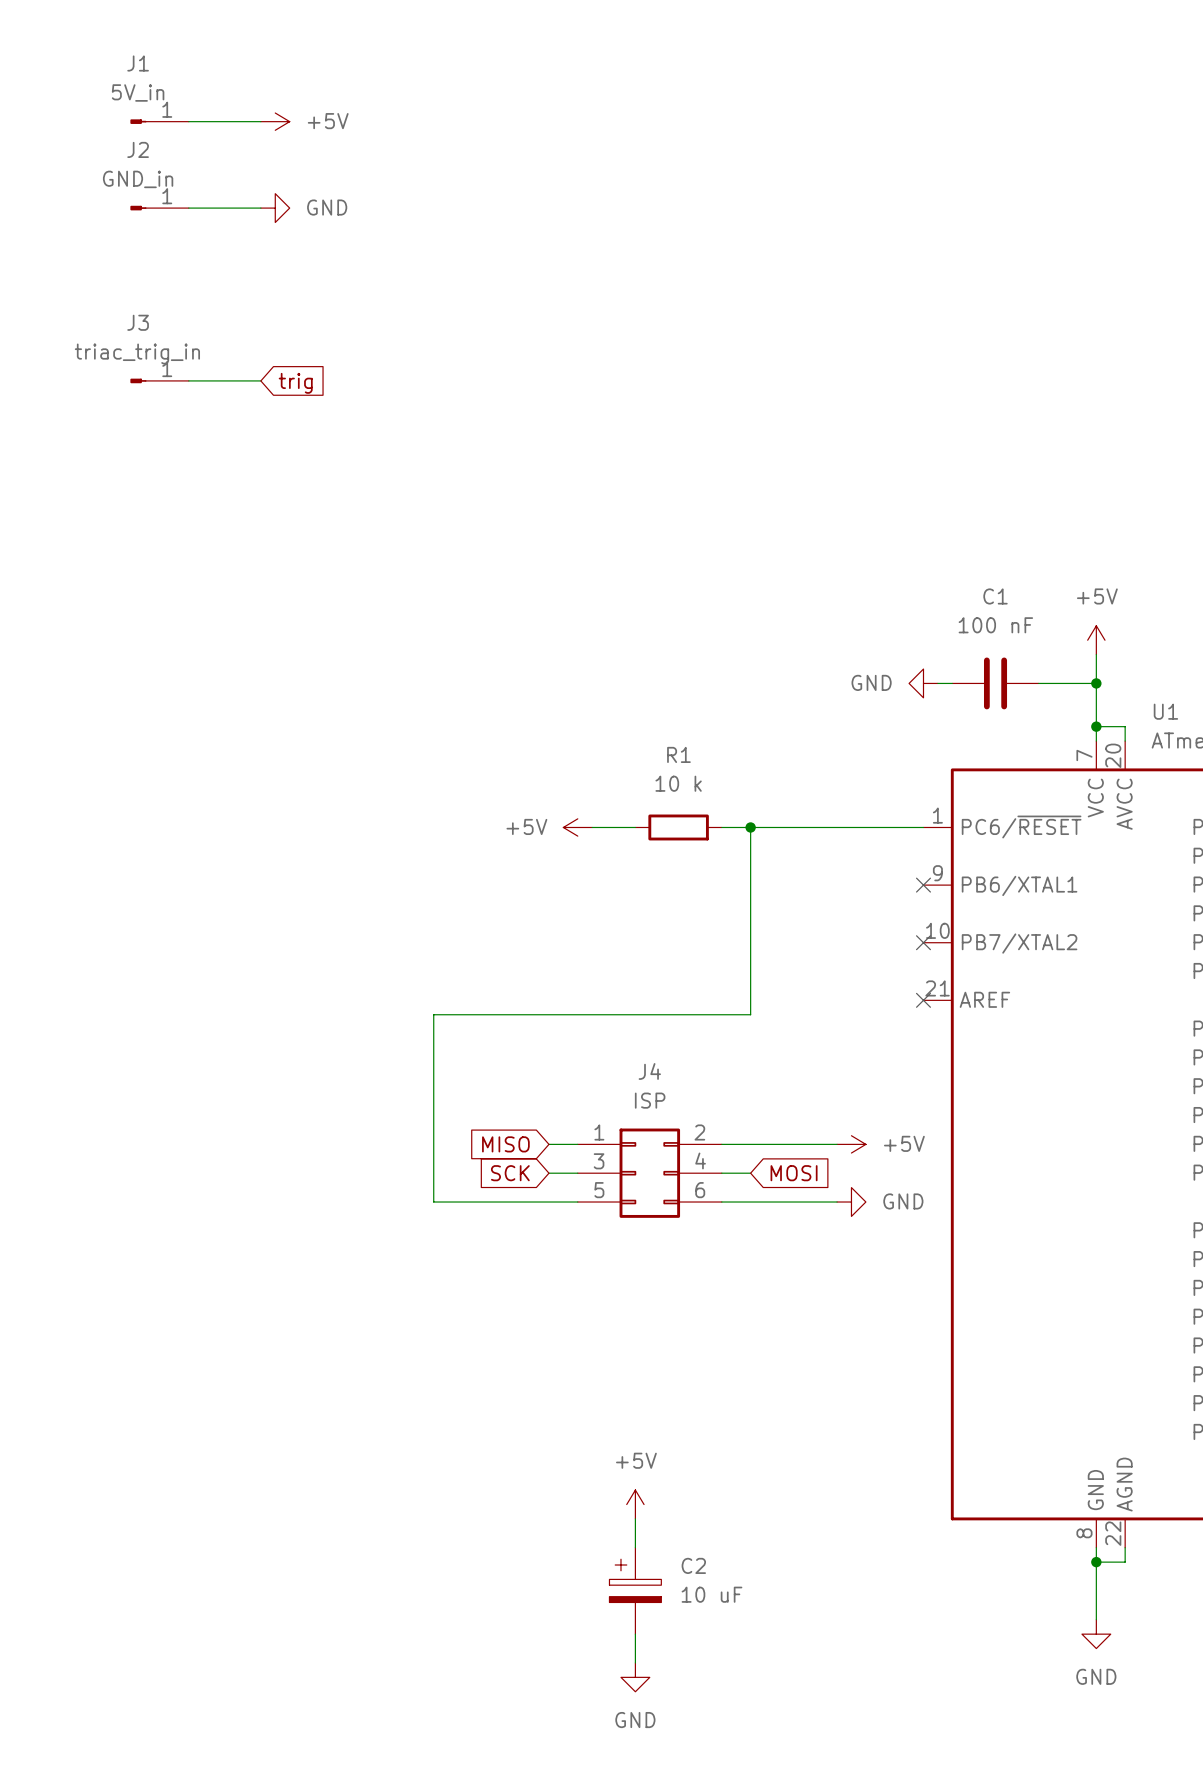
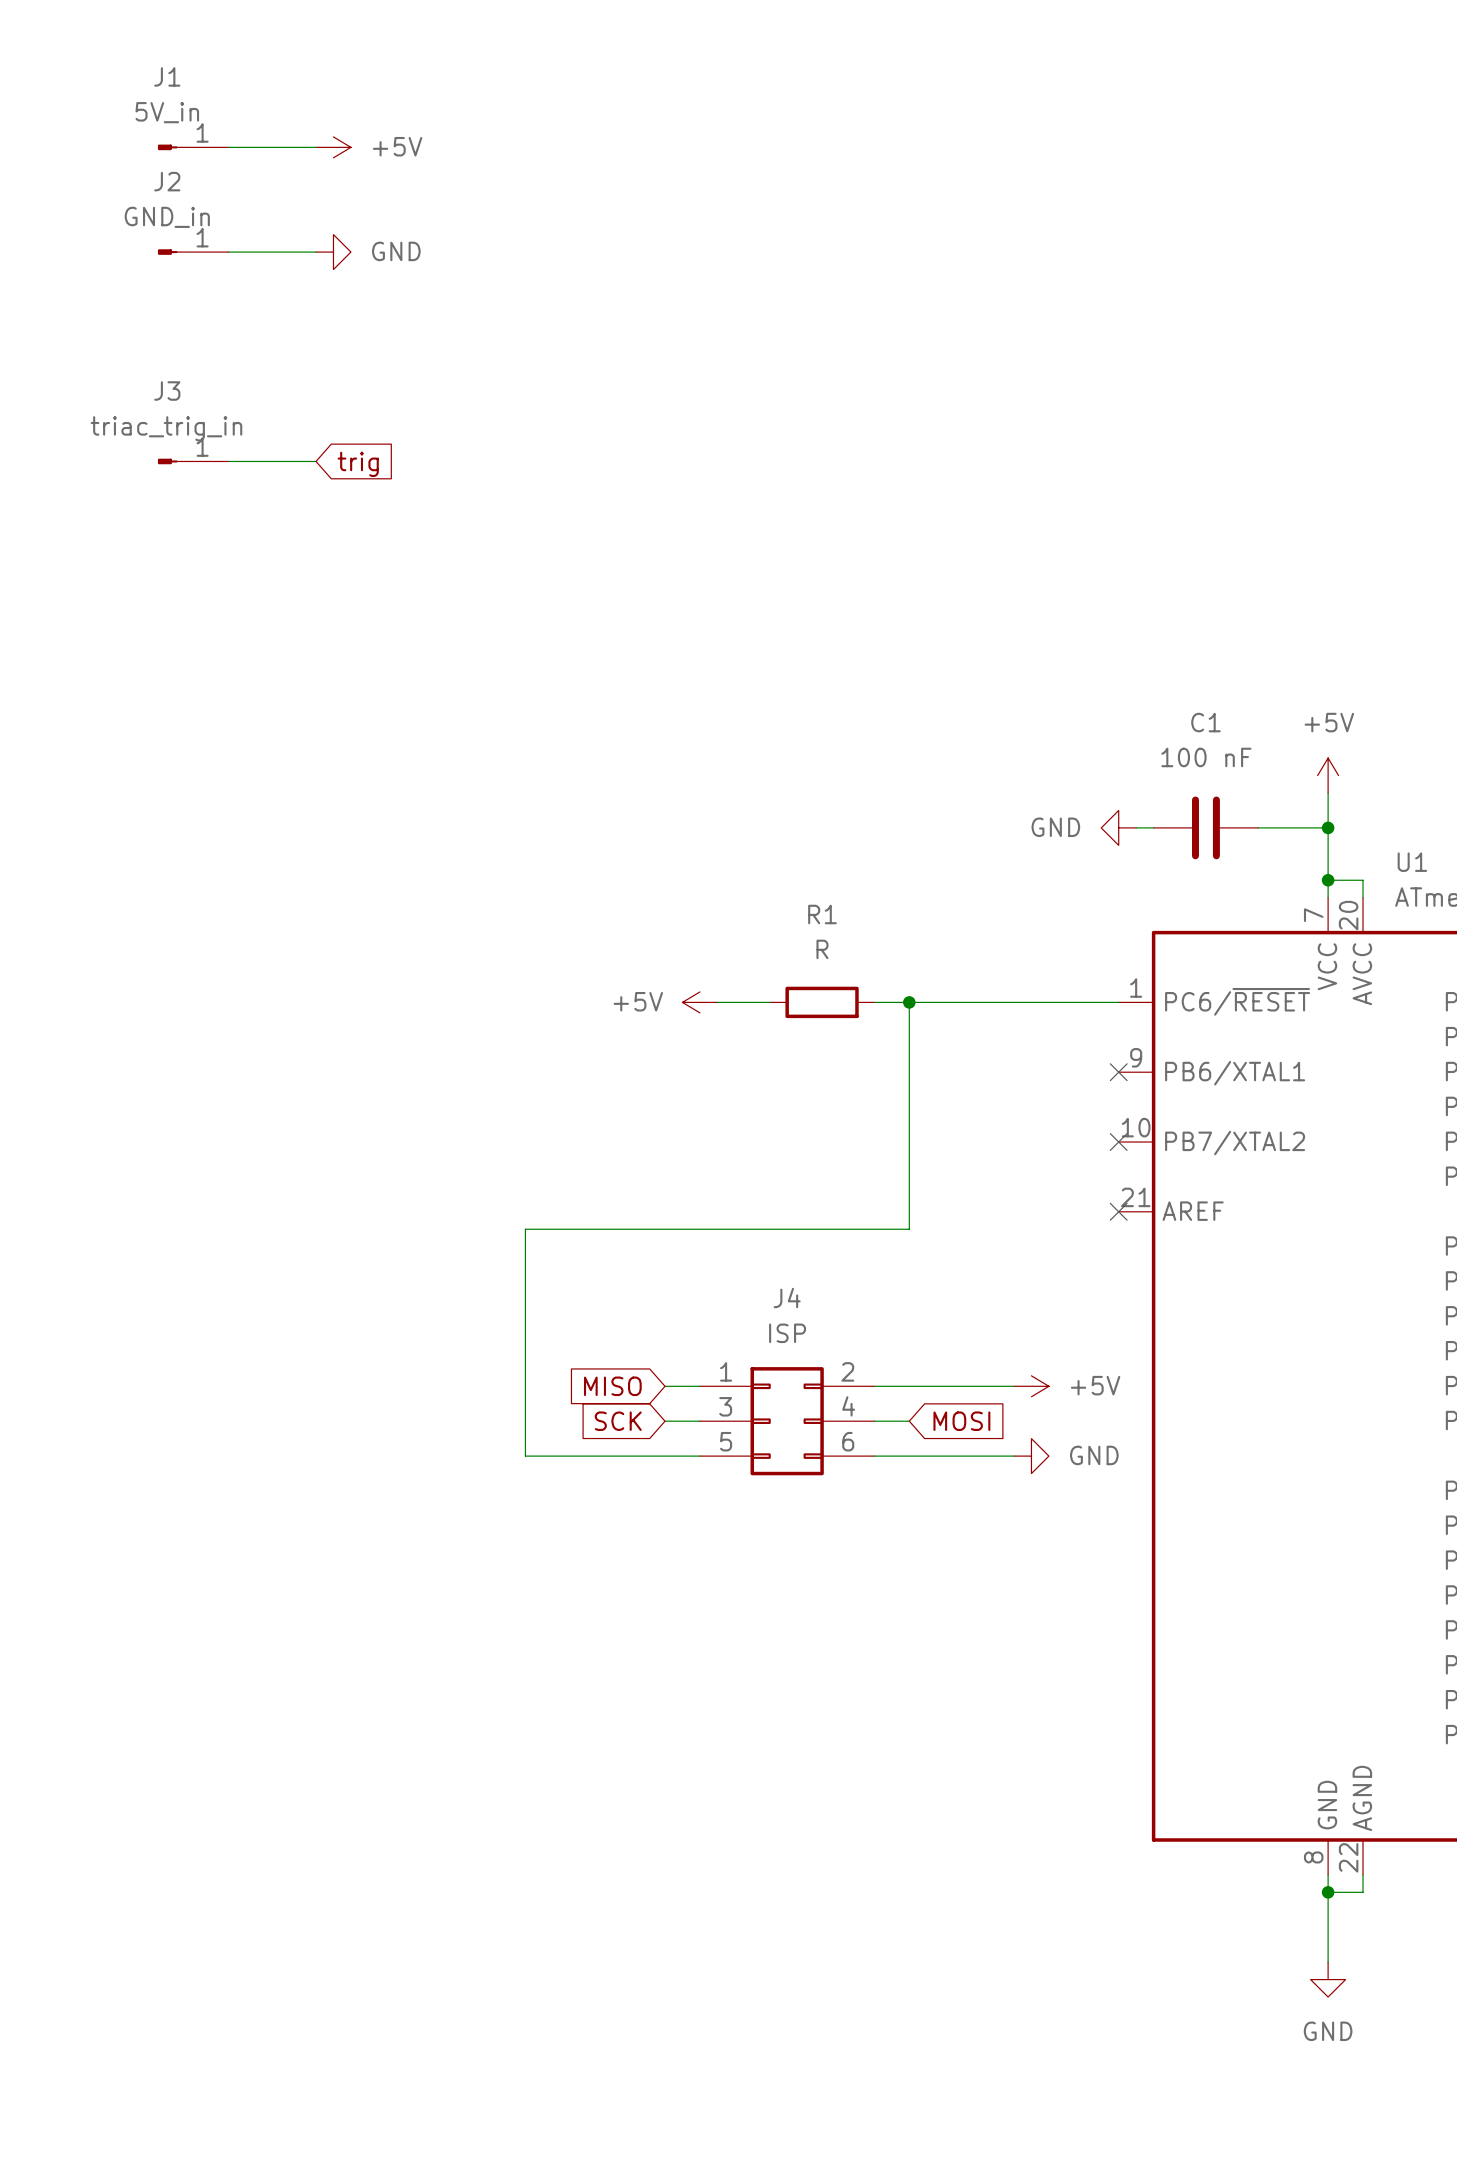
R1 value: 10 k (678, 783) -> R (822, 949)
power symbol: +5V (635, 1504) -> none
wire: (635, 1518) (635, 1547) -> none
C2: 10 uF (635, 1590) -> none
wire: (635, 1634) (635, 1662) -> none
power symbol: GND (635, 1677) -> none

